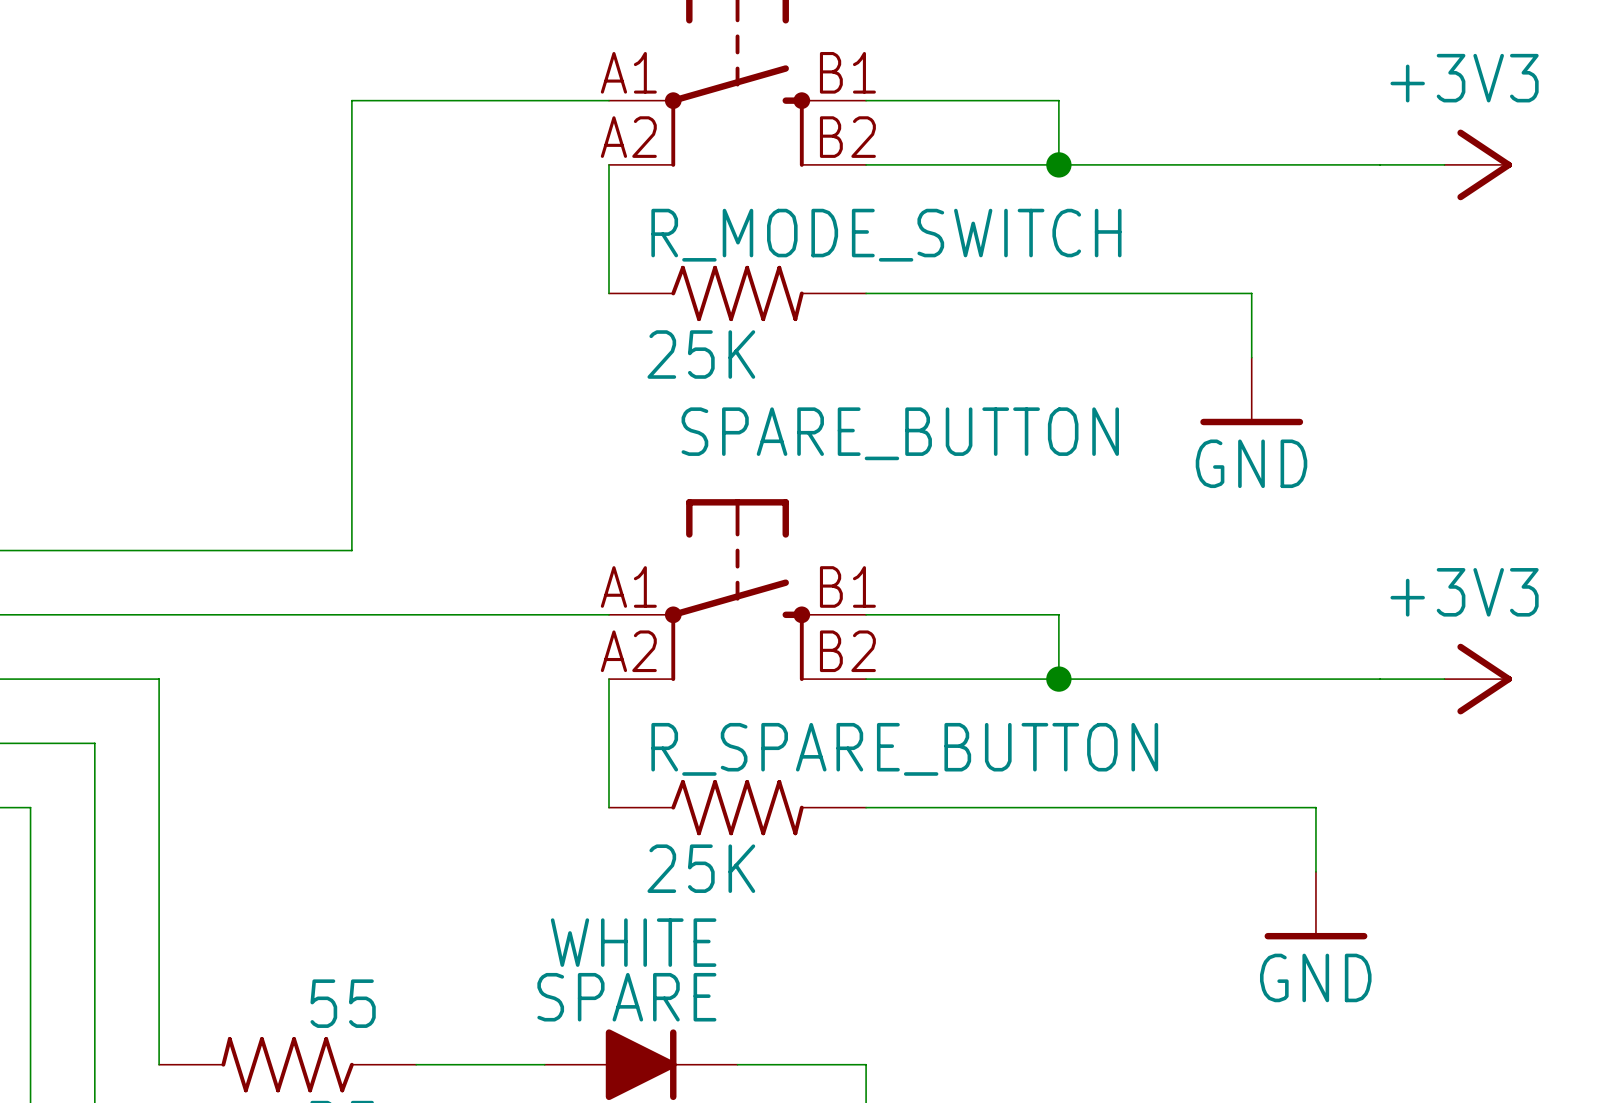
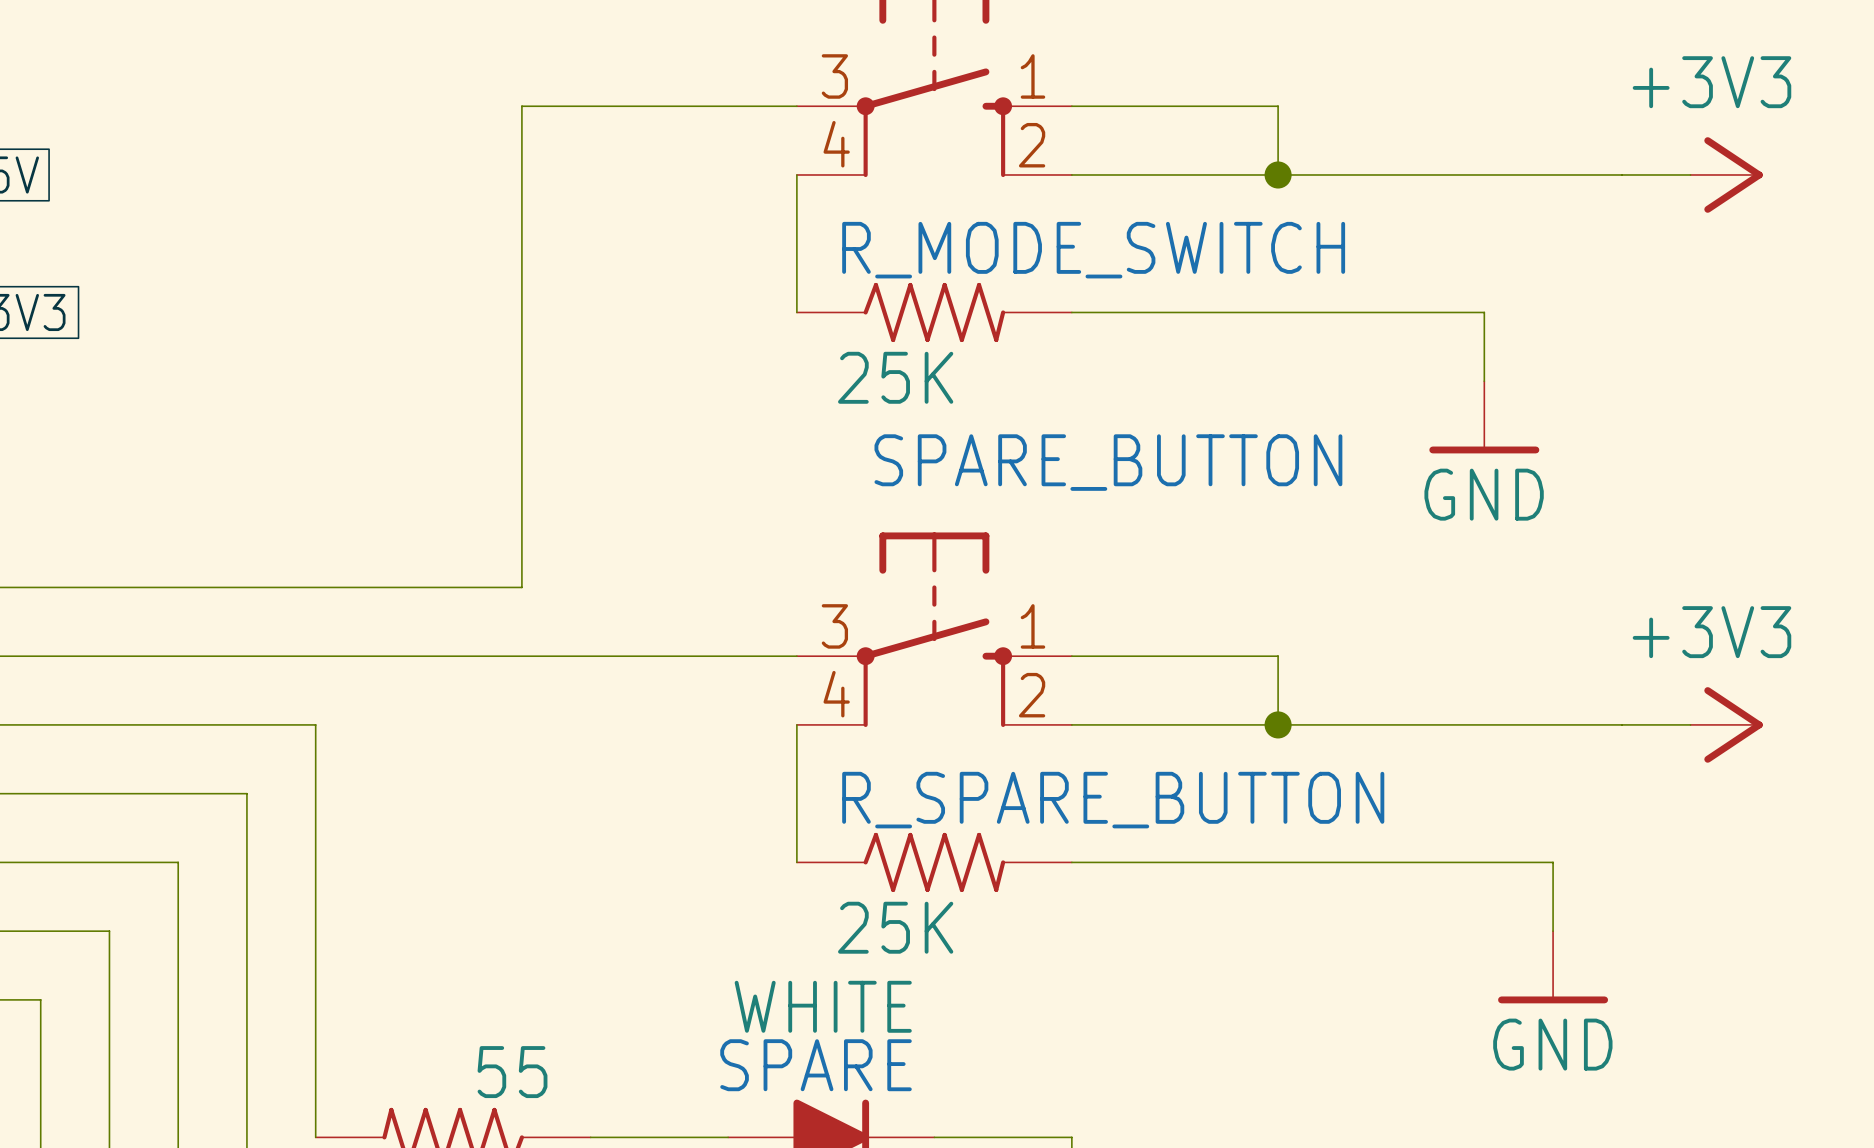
part pin number: A1 (628, 72) -> 3 (834, 76)
part pin number: B1 (847, 72) -> 1 (1032, 76)
part pin number: A2 (628, 137) -> 4 (836, 144)
part pin number: B2 (847, 137) -> 2 (1032, 145)
SPARE_BUTTON pin number: A1 (628, 586) -> 3 (834, 626)
SPARE_BUTTON pin number: B1 (847, 586) -> 1 (1032, 626)
SPARE_BUTTON pin number: A2 (628, 651) -> 4 (836, 694)
SPARE_BUTTON pin number: B2 (847, 651) -> 2 (1032, 695)

